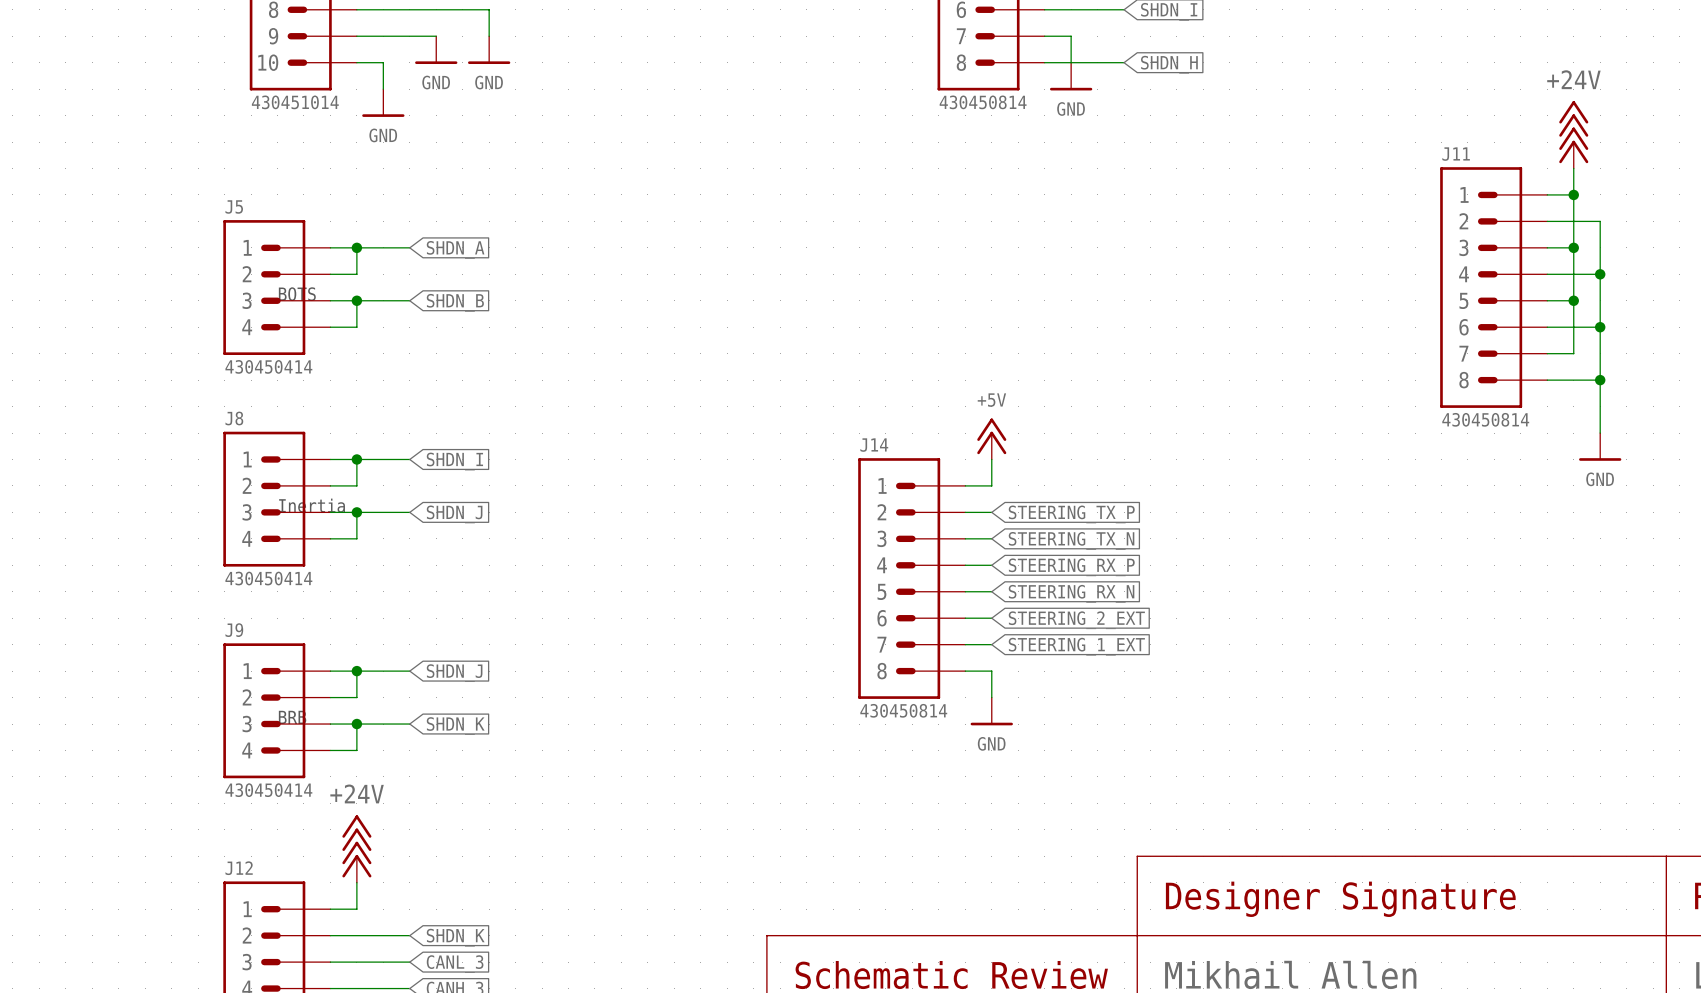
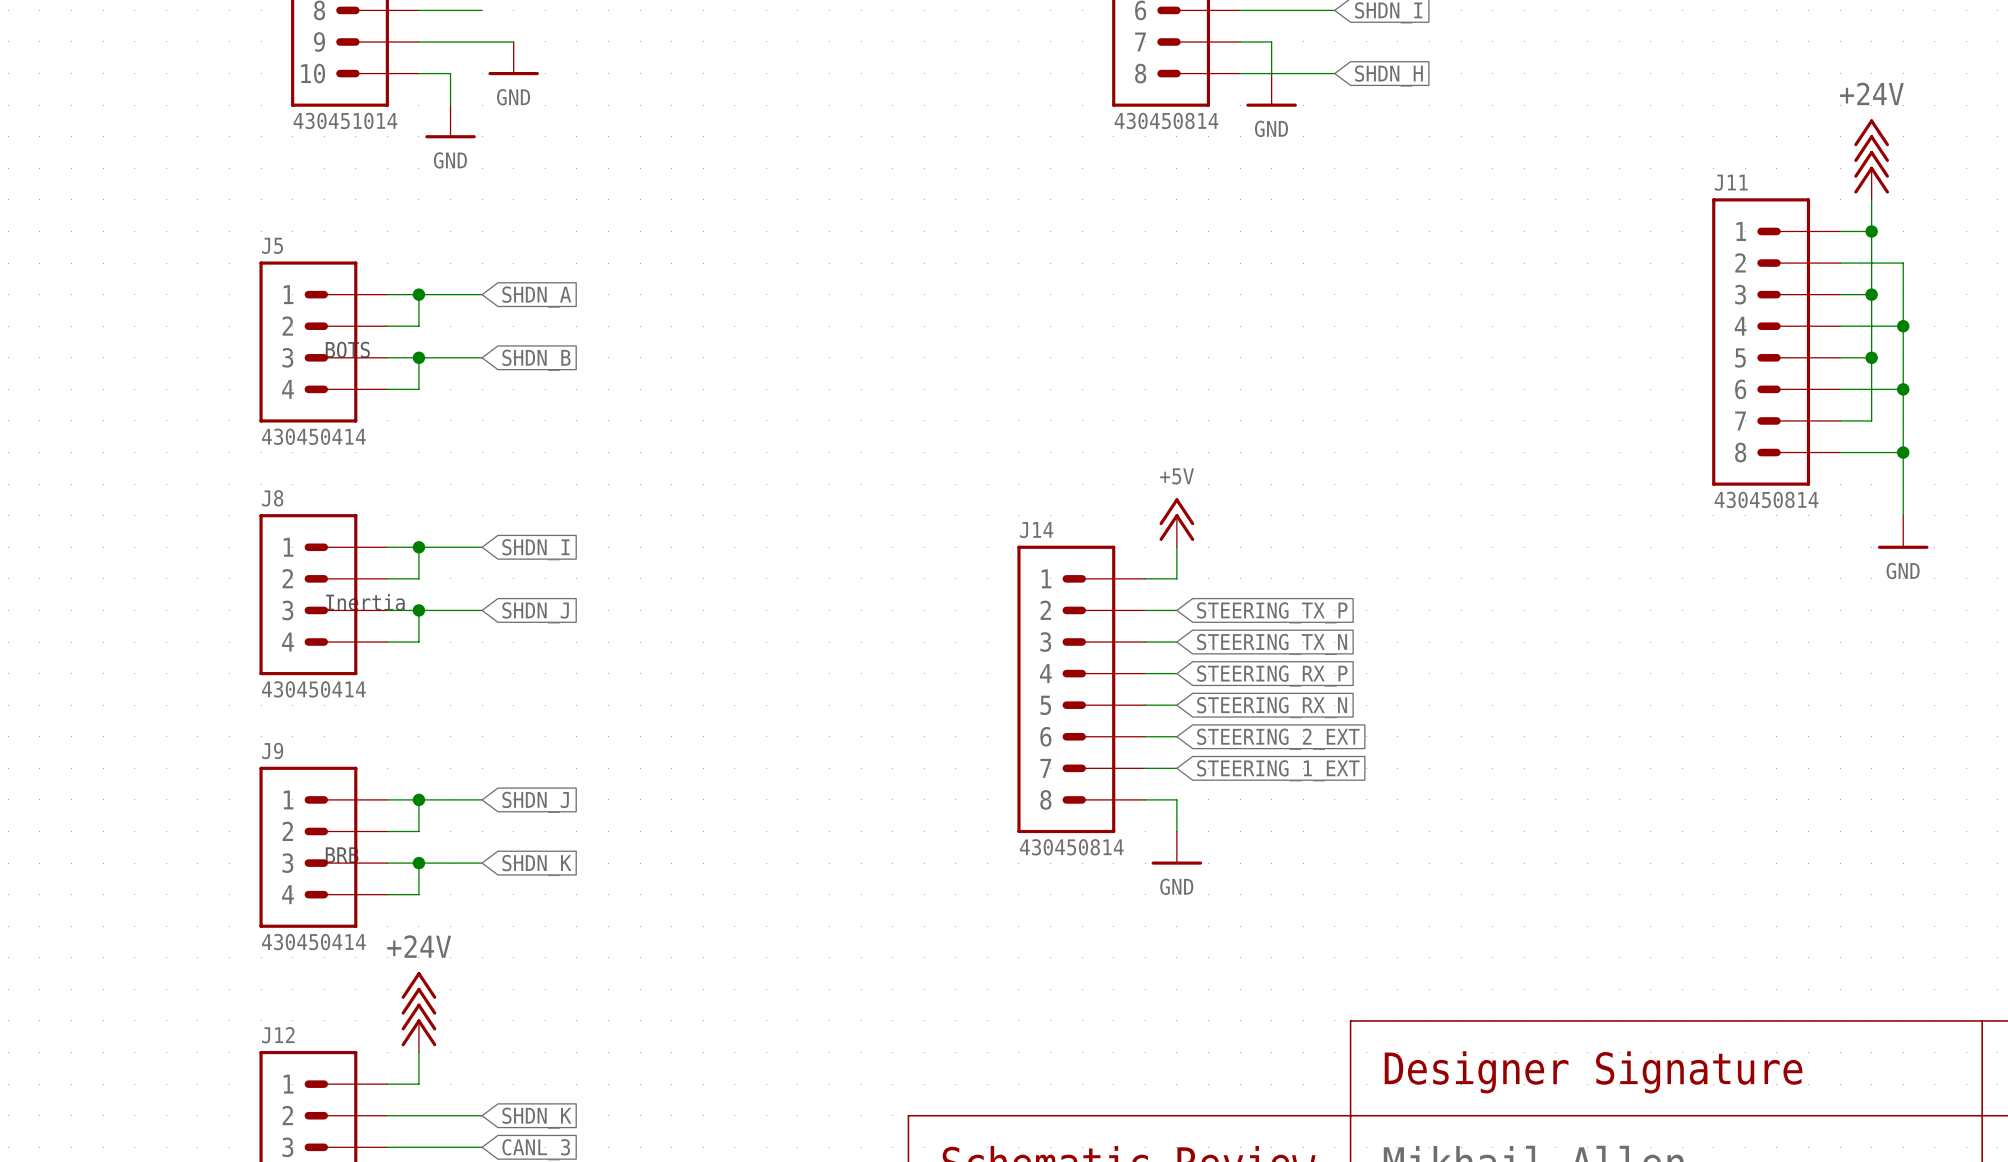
wire: (409, 9) (489, 9) (489, 36) -> none
power symbol: GND (489, 50) -> none

